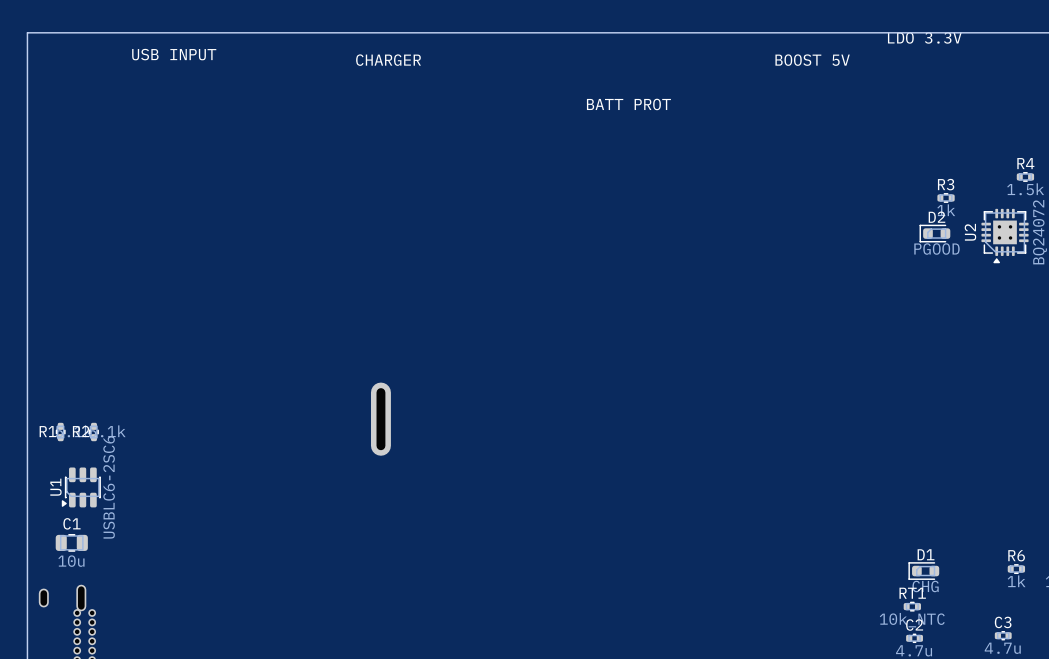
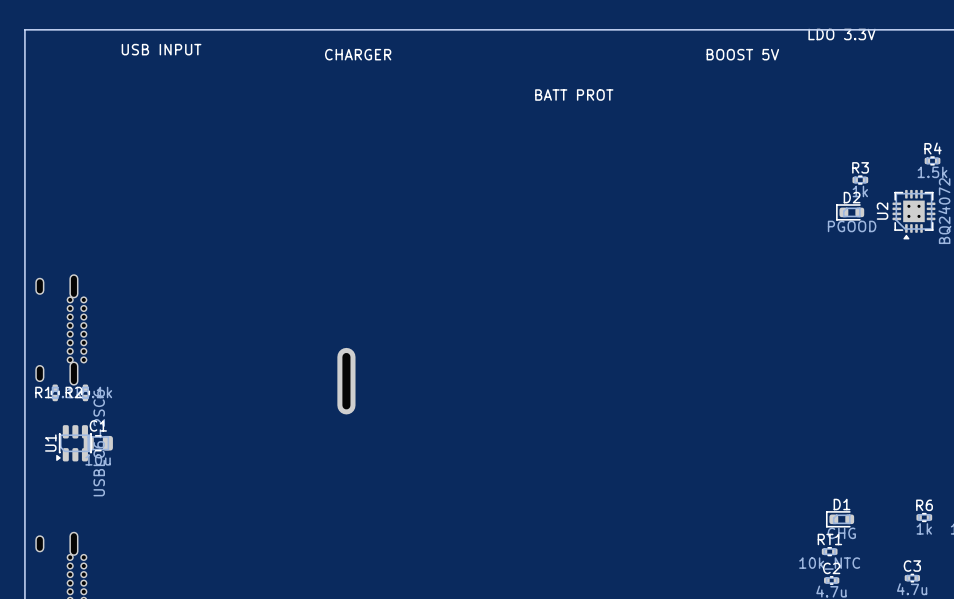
part: none -> (61, 329)
C1 position: (71, 542) -> (98, 443)

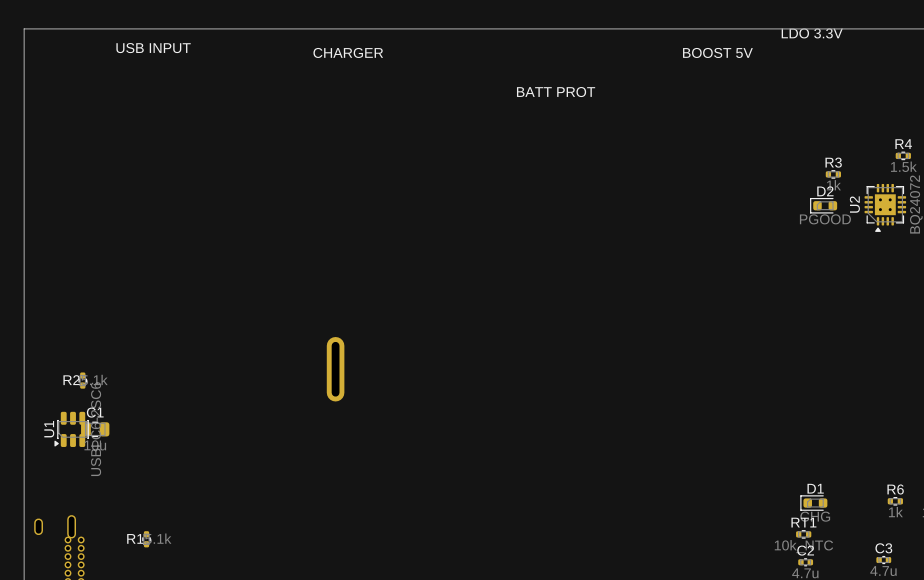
part: (61, 329) -> none
R1 position: (55, 392) -> (146, 539)

